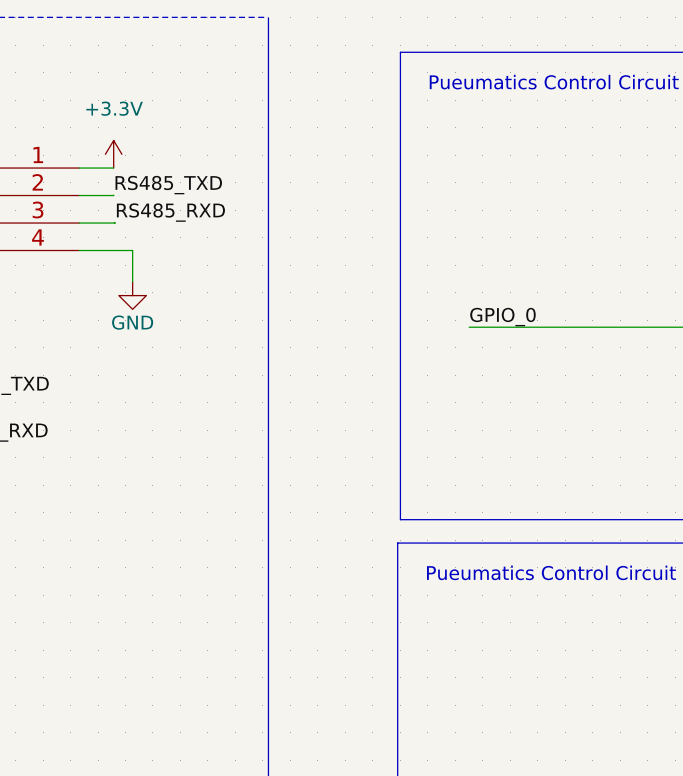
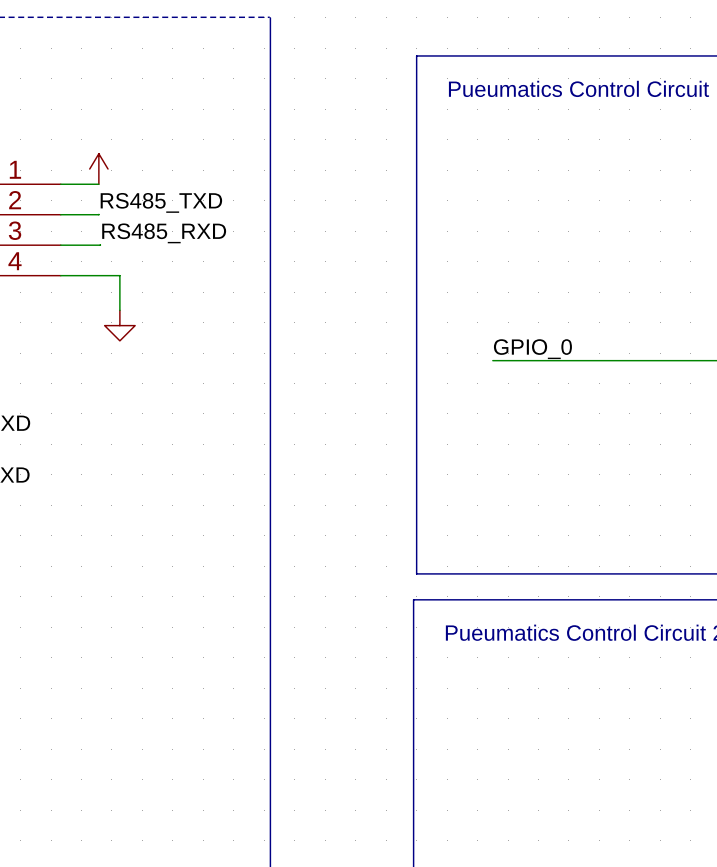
power symbol text: +3.3V (114, 108) -> none
power symbol text: GND (132, 322) -> none

